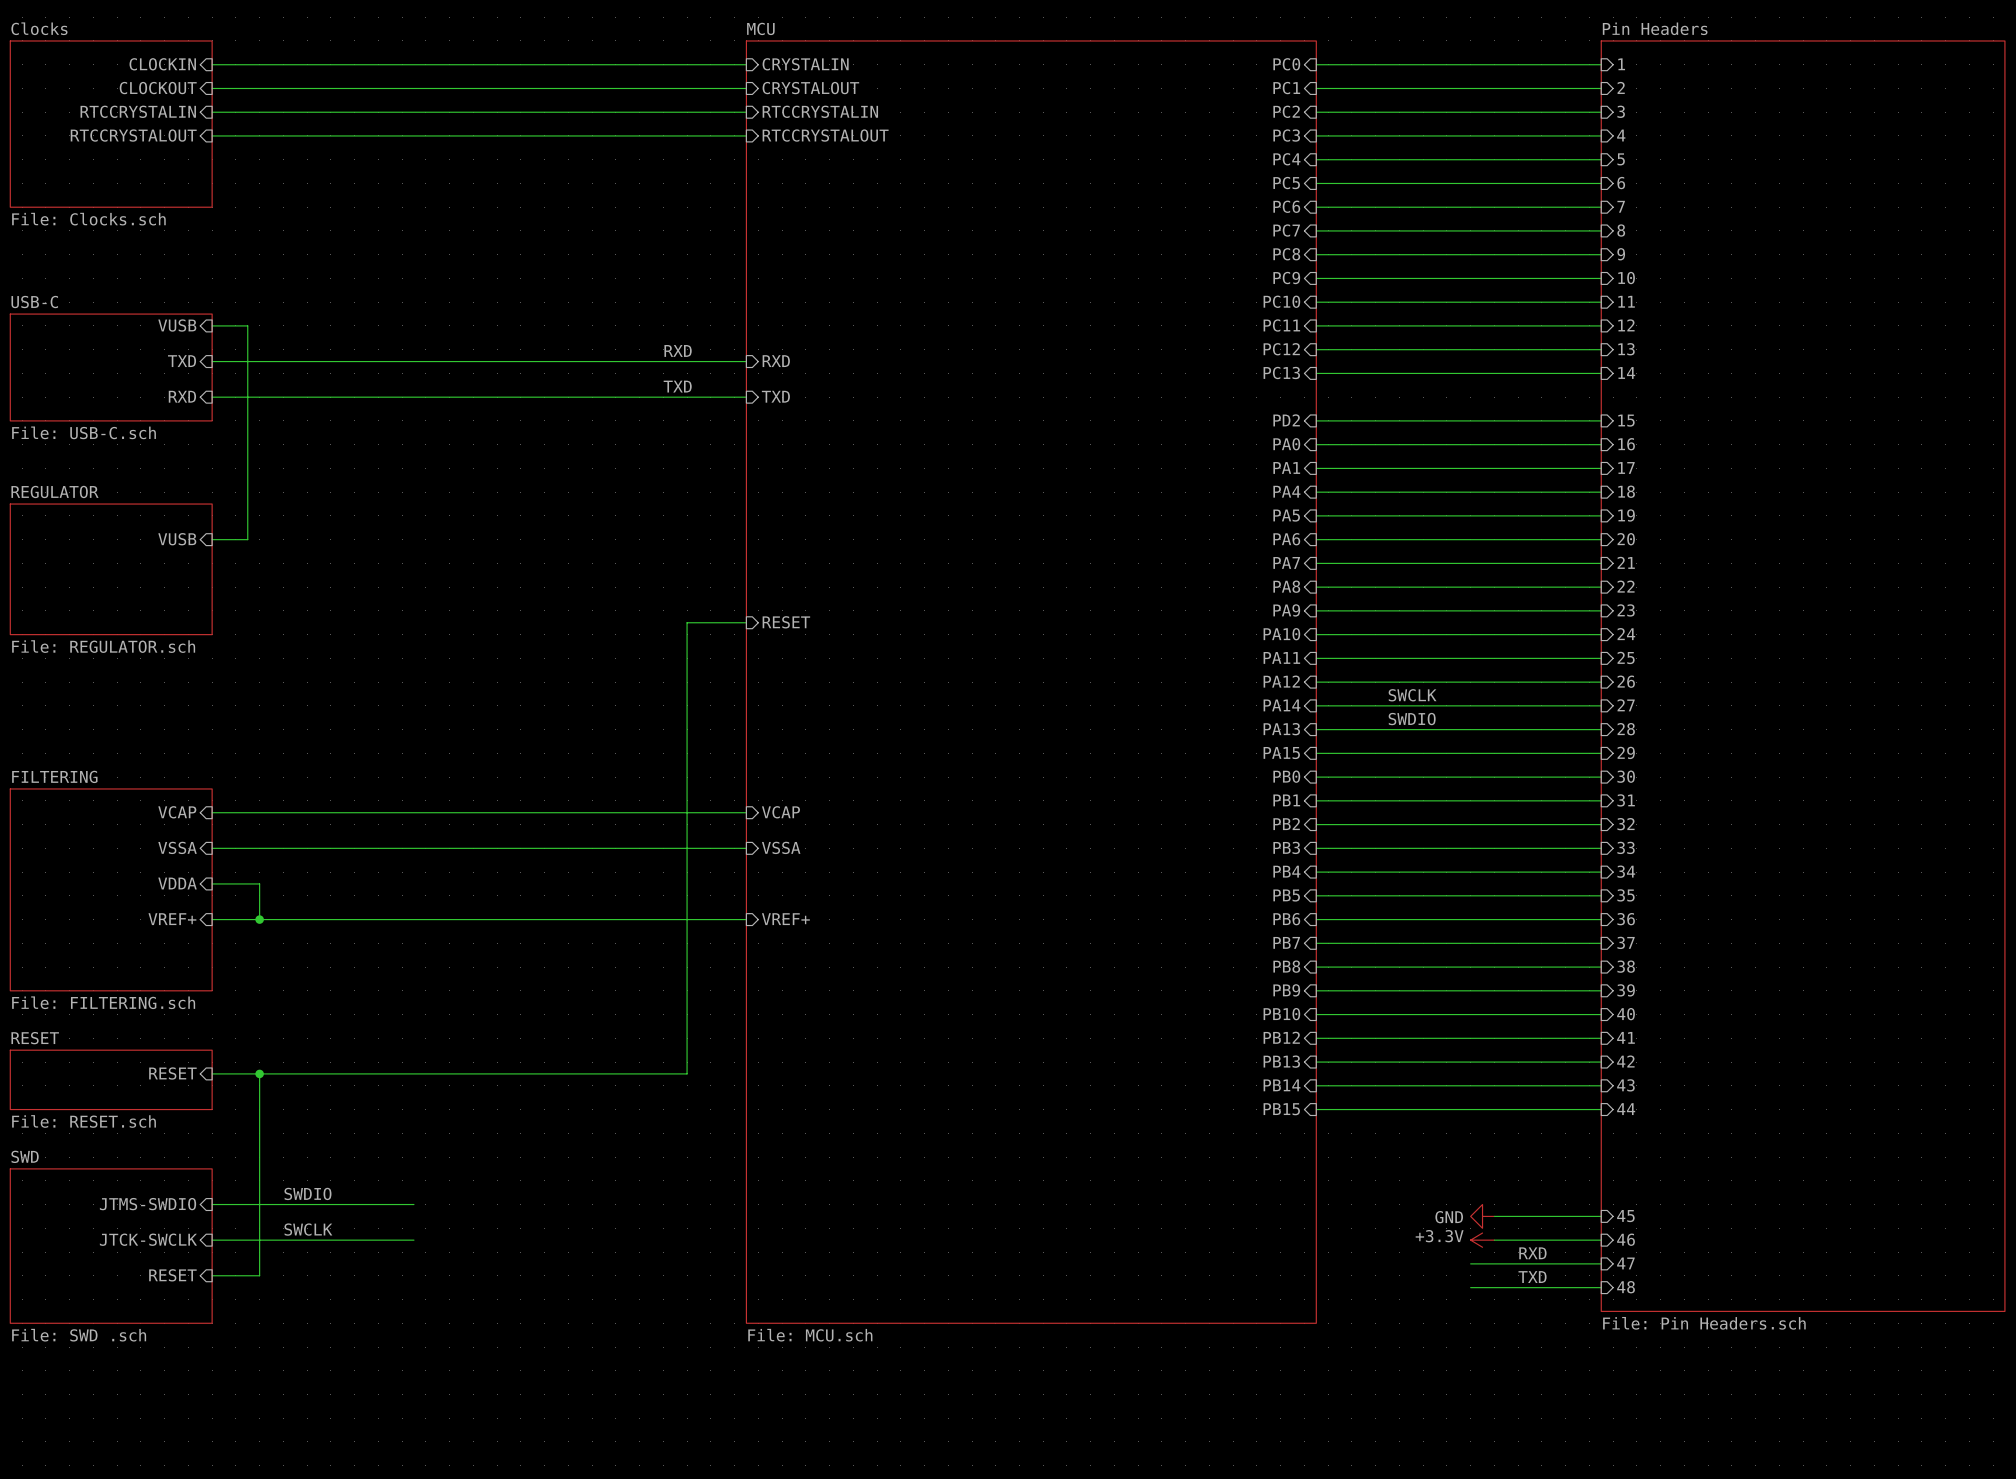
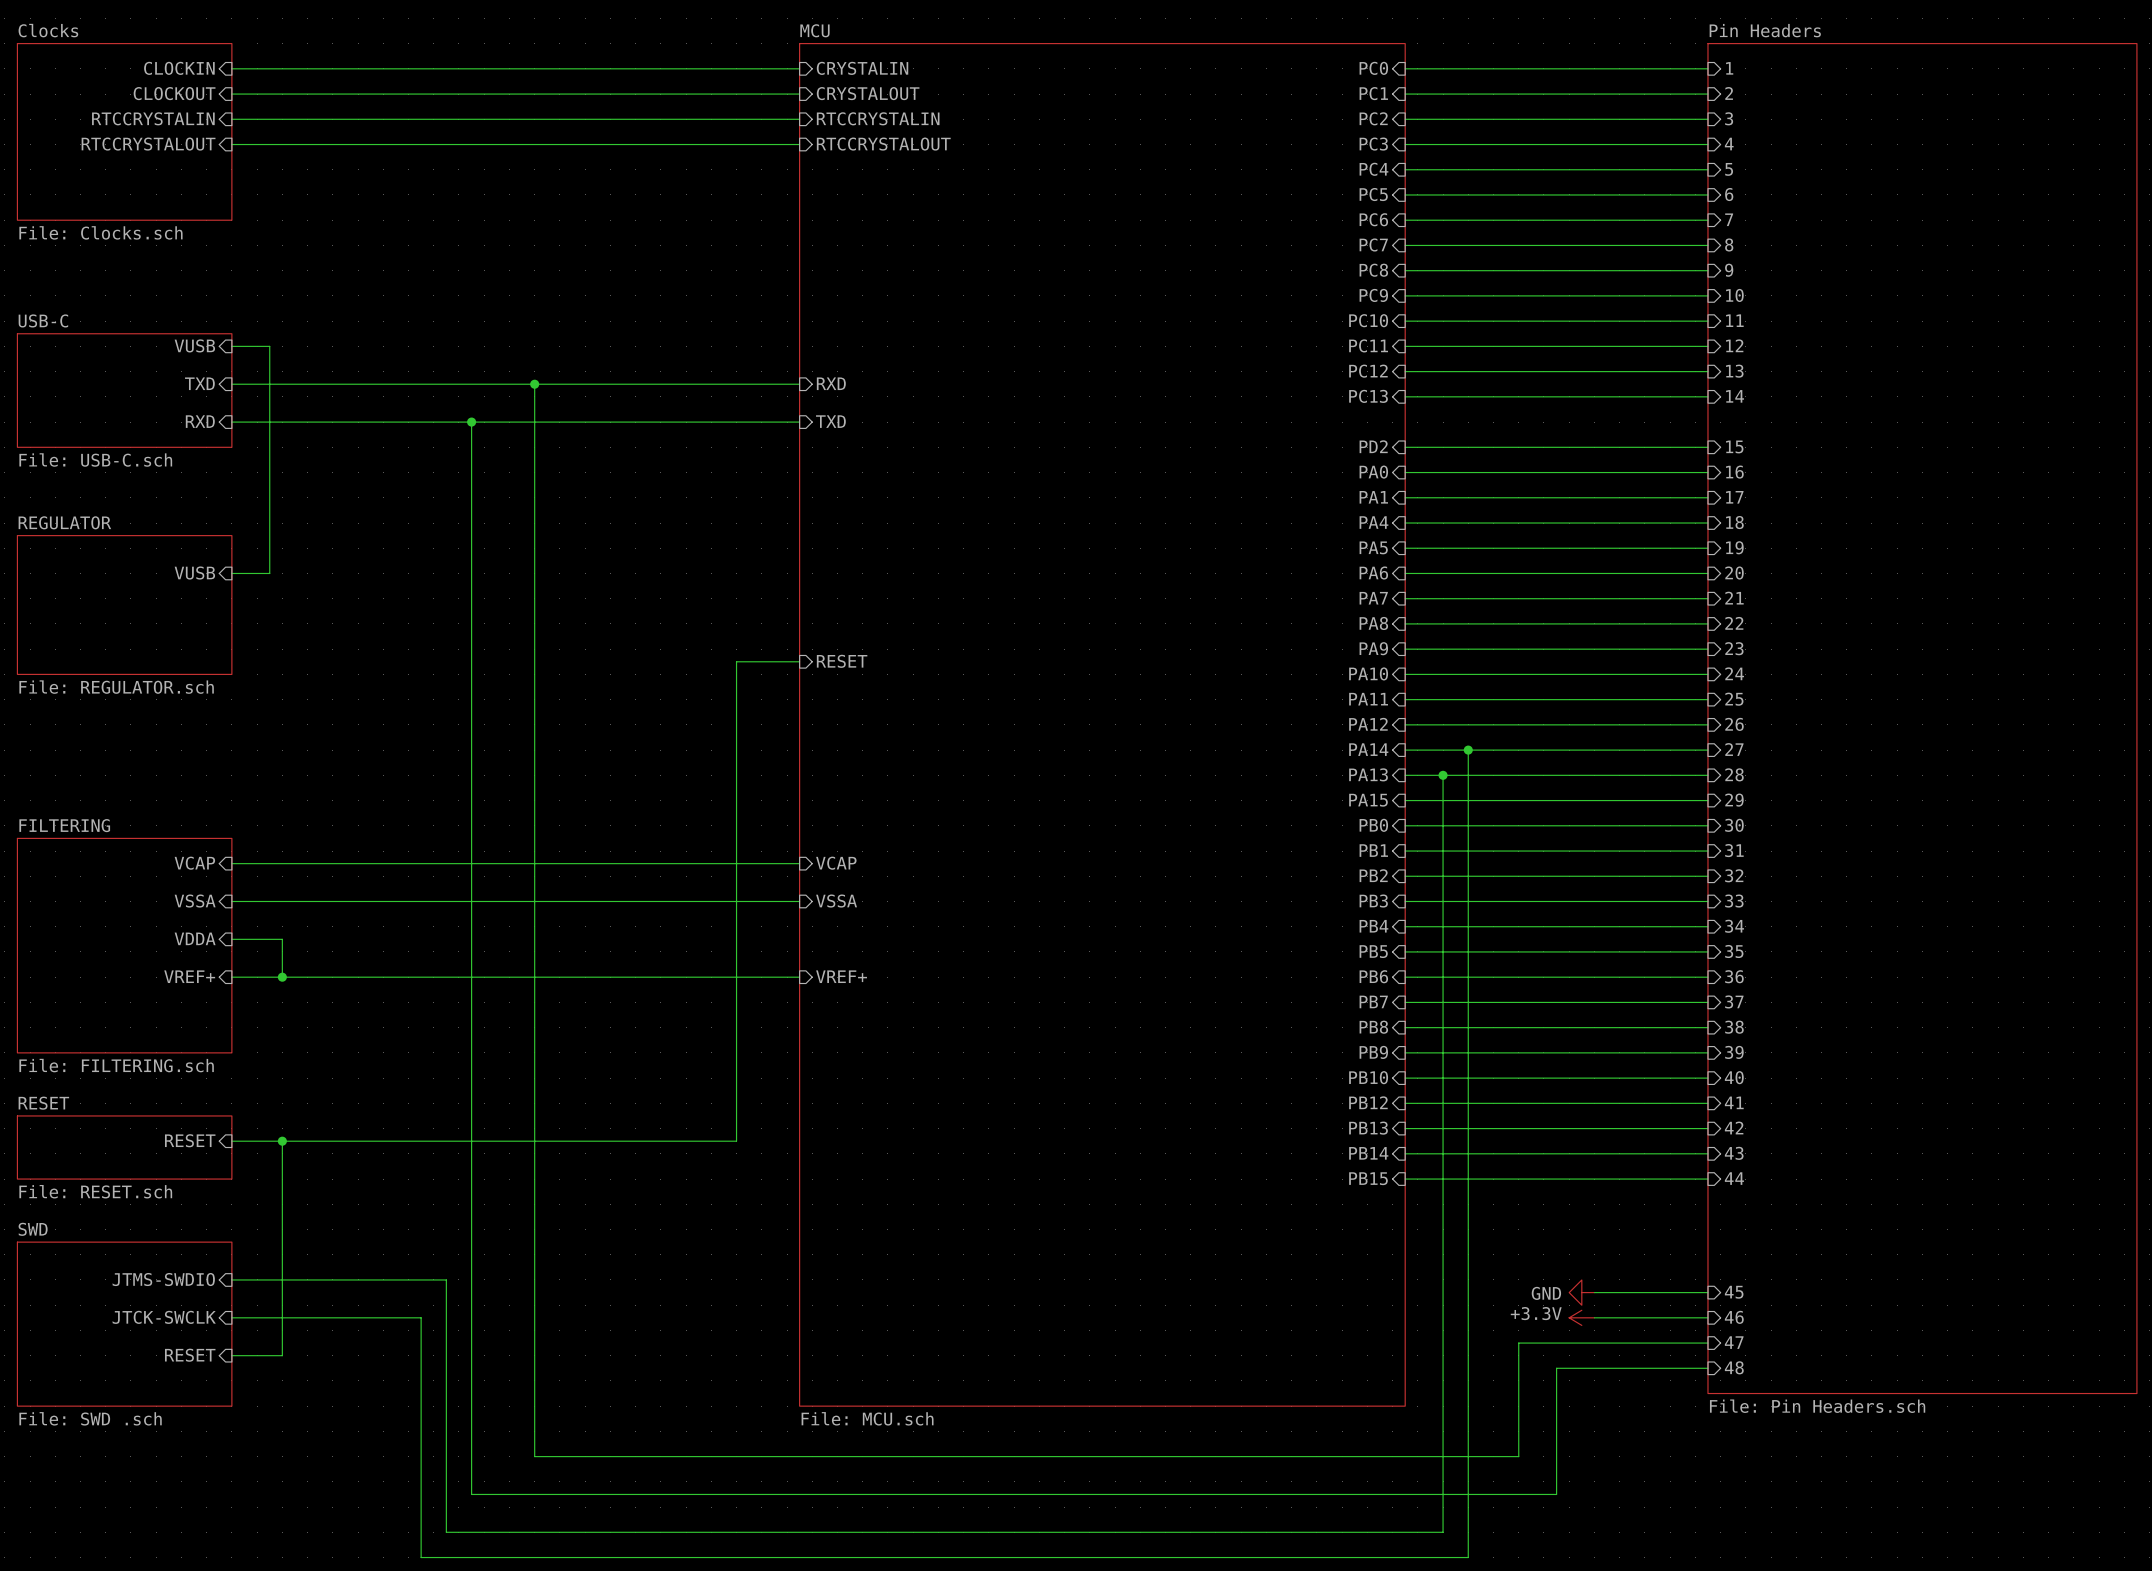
label: RXD (678, 350) -> none
wire: none -> (534, 384) (534, 1456) (1518, 1456) (1518, 1343) (1569, 1343)
junction: none -> (534, 384)
label: TXD (677, 386) -> none
wire: none -> (471, 422) (471, 1494) (1556, 1494) (1556, 1368) (1569, 1368)
junction: none -> (471, 422)
label: SWCLK (1412, 695) -> none
junction: none -> (1468, 750)
label: SWDIO (1412, 719) -> none
wire: none -> (1443, 775) (1443, 1532) (446, 1532) (446, 1279)
junction: none -> (1443, 775)
label: SWDIO (307, 1193) -> none
label: SWCLK (308, 1229) -> none
wire: (390, 1240) (413, 1240) -> (421, 1317) (421, 1557) (1468, 1557) (1468, 750)
label: RXD (1532, 1253) -> none
label: TXD (1532, 1277) -> none

